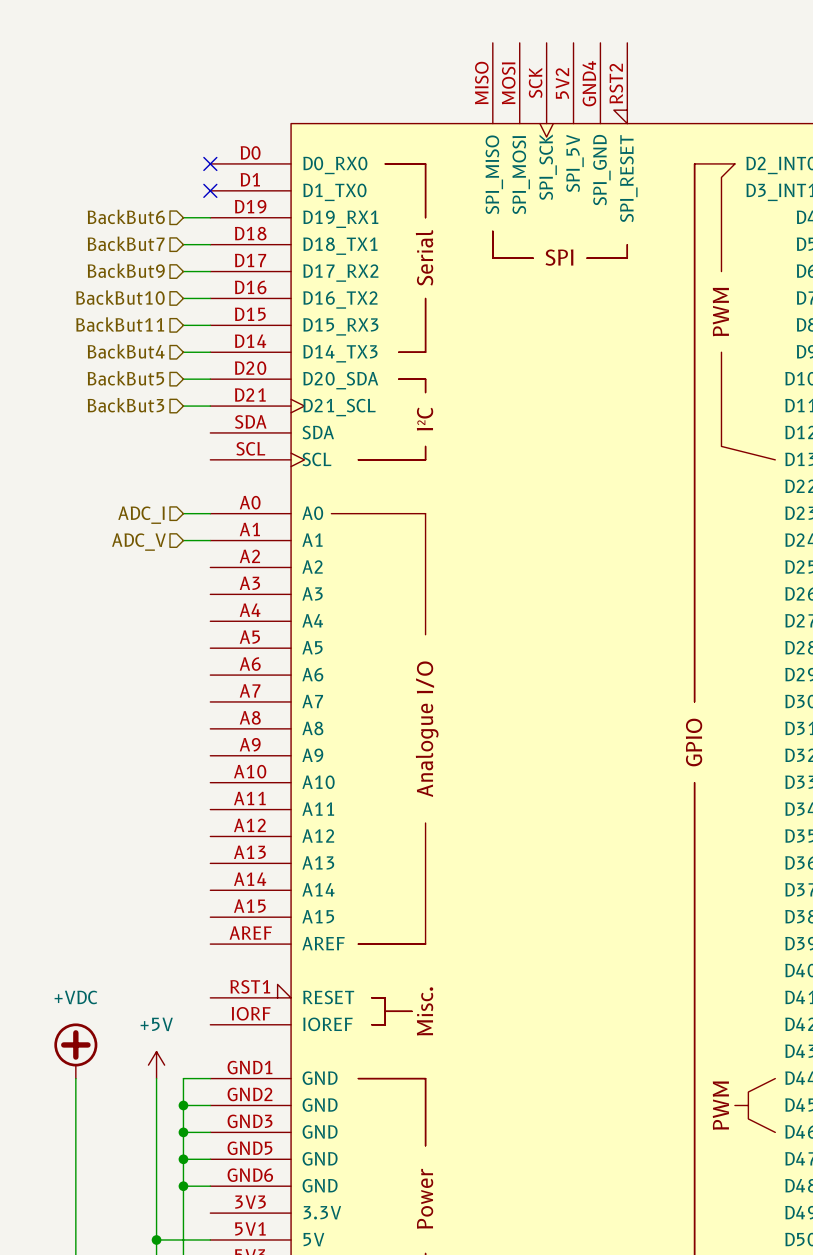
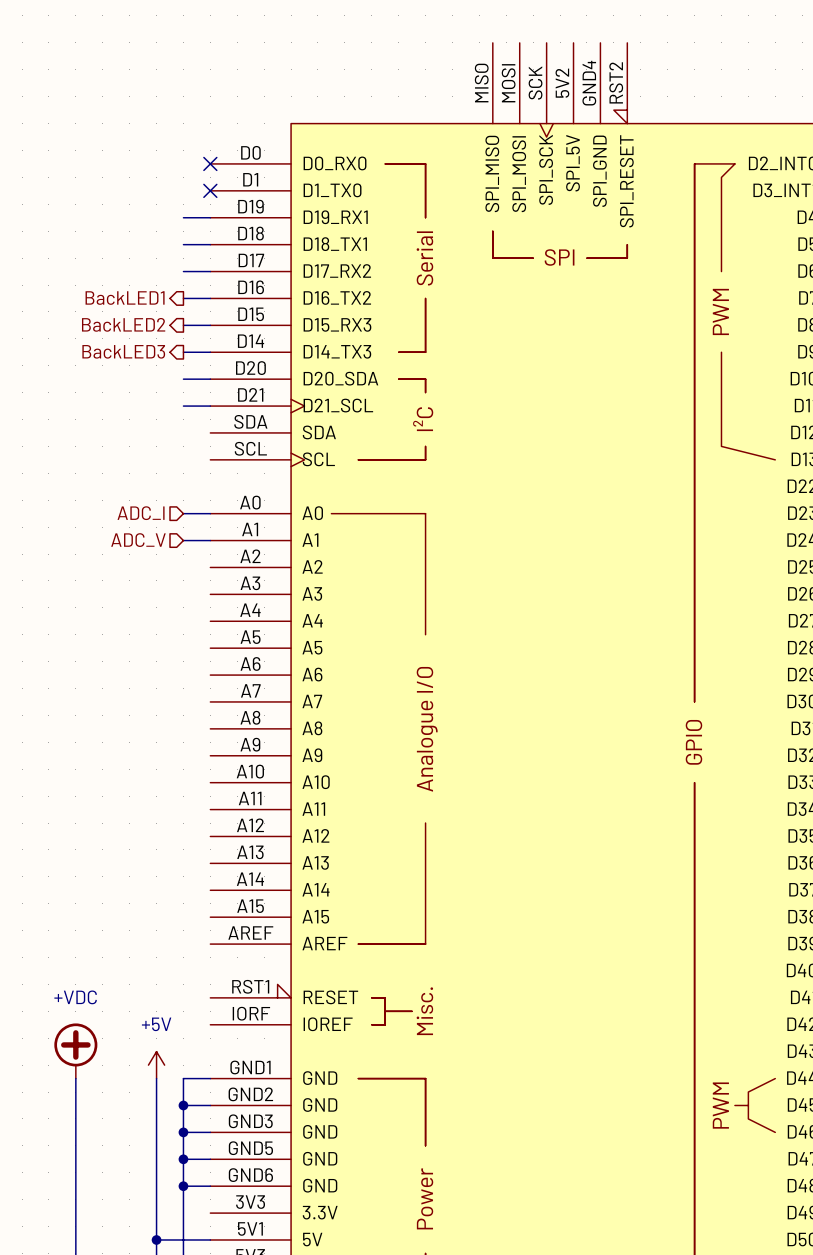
hierarchical label: BackBut6 (126, 216) -> none
hierarchical label: BackBut7 (126, 243) -> none
hierarchical label: BackBut9 (126, 270) -> none
hierarchical label shape: input (120, 297) -> output (125, 298)
hierarchical label: BackBut10 (120, 297) -> BackLED1 (125, 298)
hierarchical label shape: input (120, 324) -> output (123, 324)
hierarchical label: BackBut11 (120, 324) -> BackLED2 (123, 324)
hierarchical label shape: input (126, 351) -> output (123, 351)
hierarchical label: BackBut4 (126, 351) -> BackLED3 (123, 351)
hierarchical label: BackBut5 (125, 378) -> none
hierarchical label: BackBut3 (125, 405) -> none

